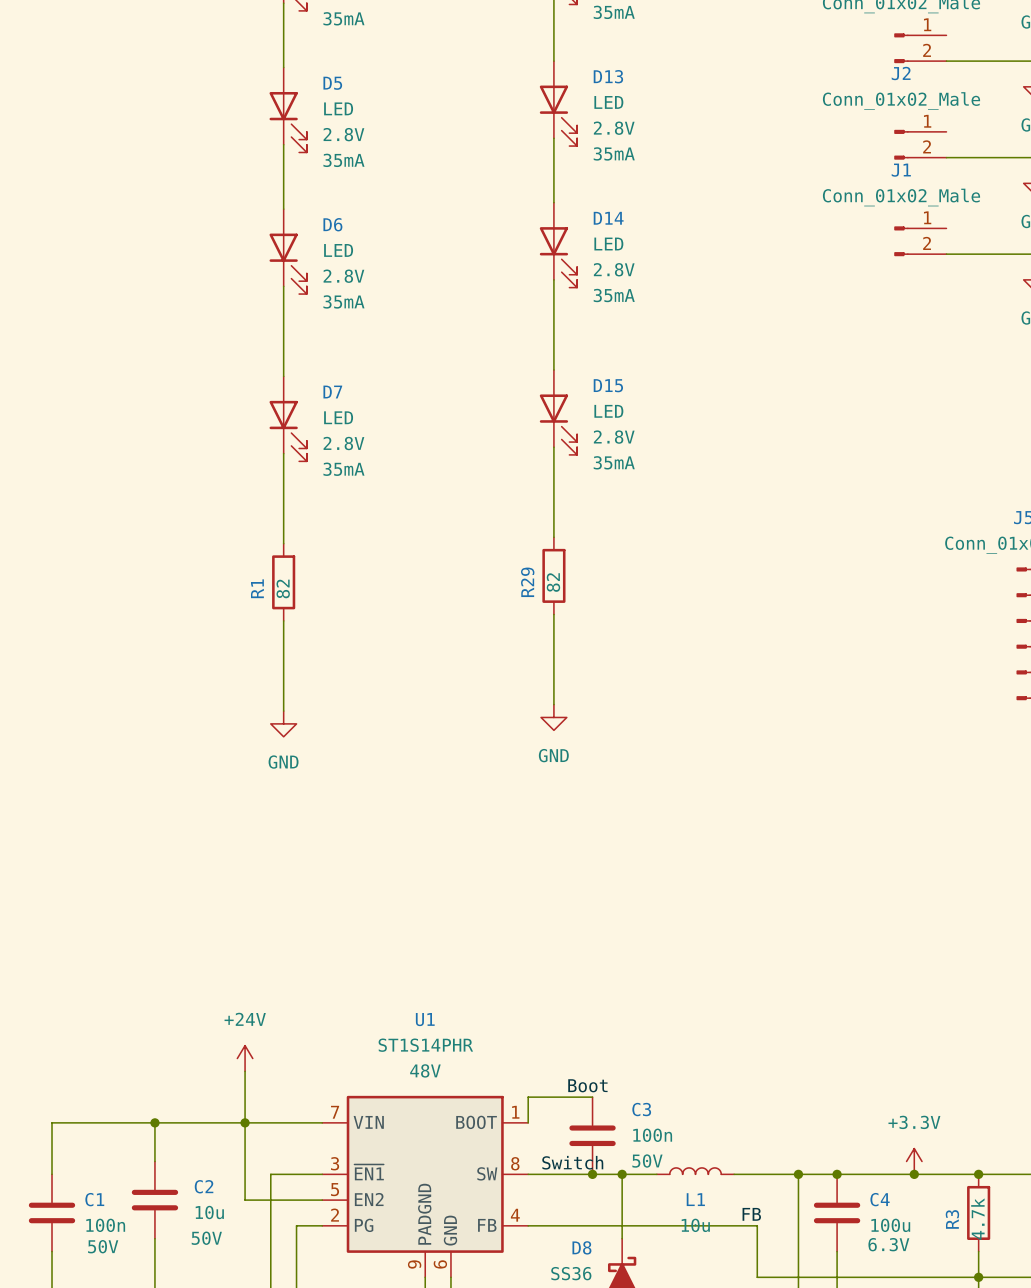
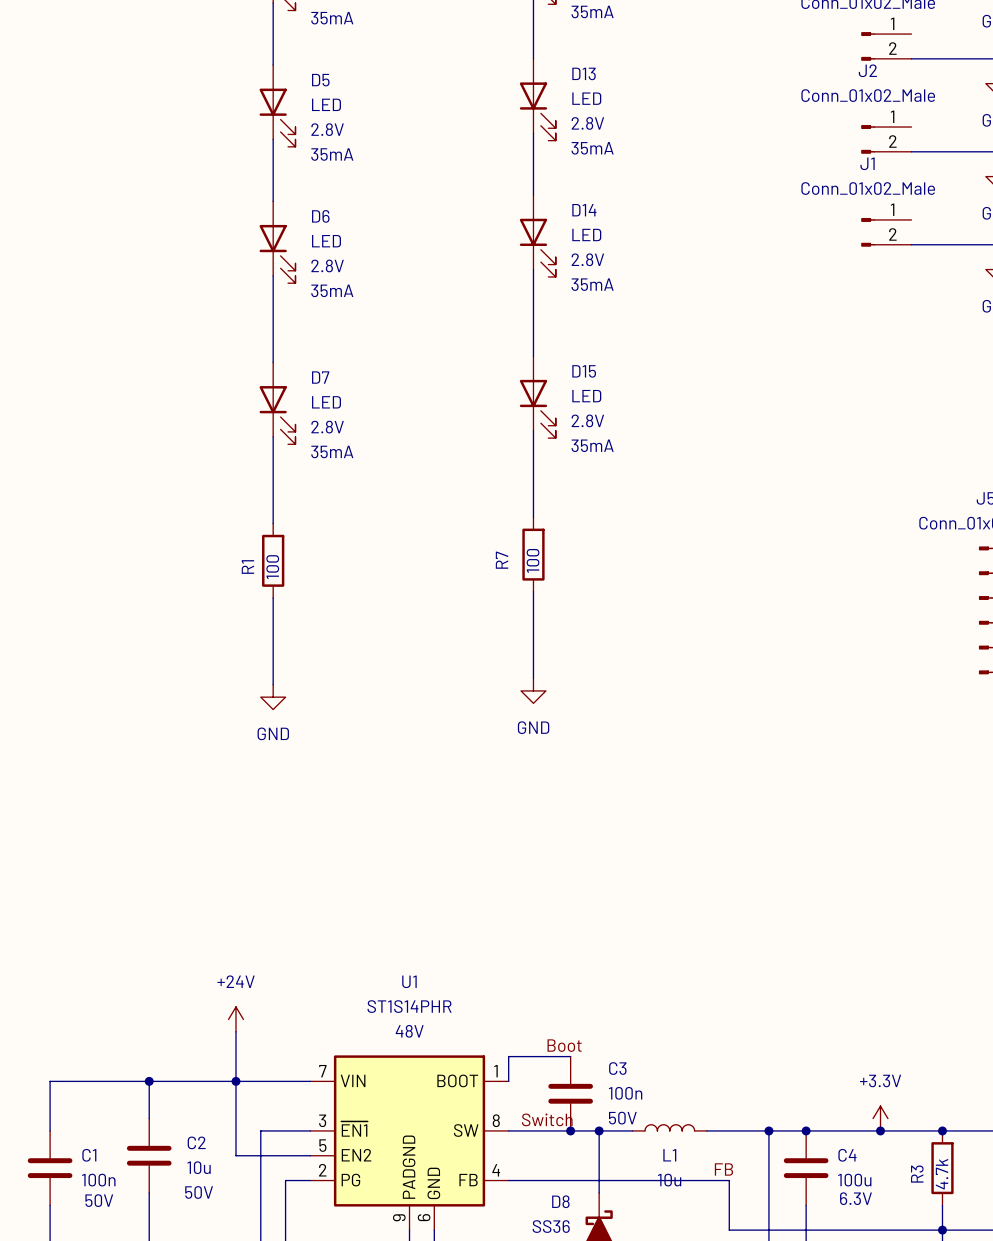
R29 name: R29 (527, 582) -> R7 (502, 560)
R29 value: 82 (553, 582) -> 100 (533, 560)
R1 value: 82 (283, 588) -> 100 (272, 567)

